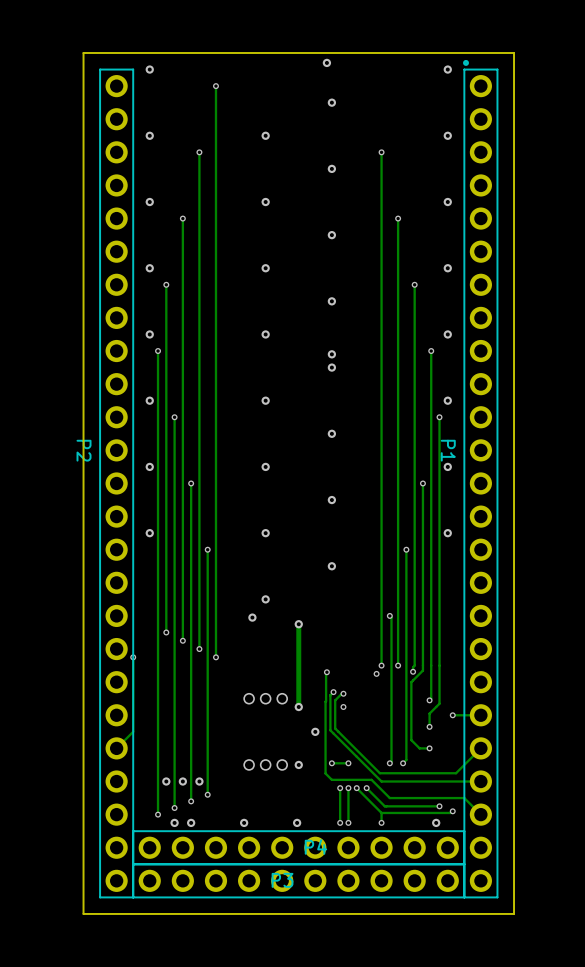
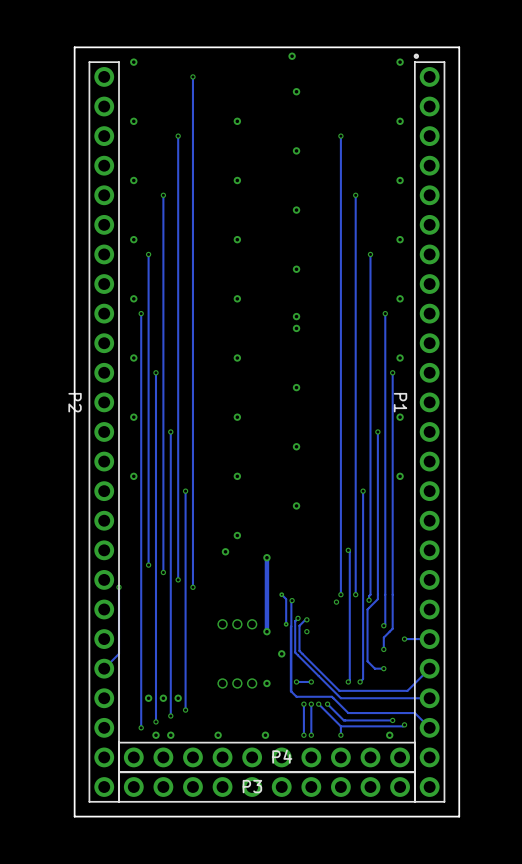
track: none -> (281, 594) (286, 599) (286, 624)
via: none -> (281, 594)
via: none -> (286, 624)

